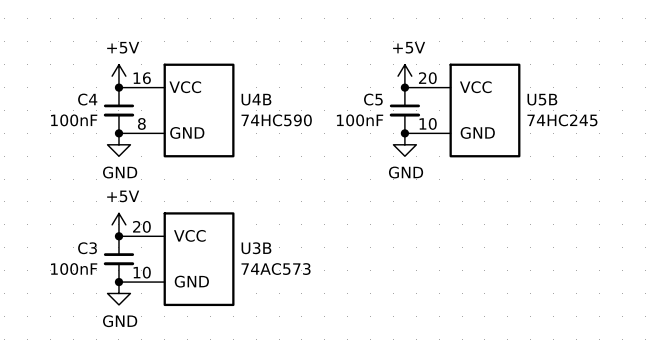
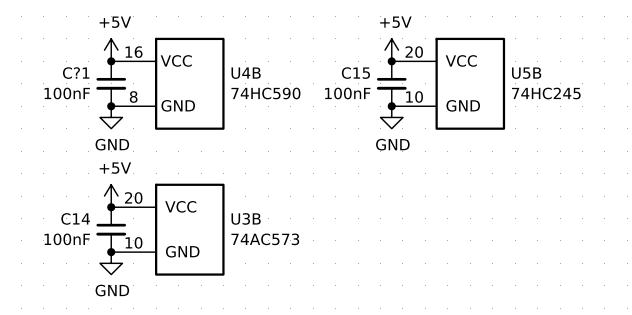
C4 name: C4 (87, 99) -> C?1 (76, 73)
C5 name: C5 (373, 99) -> C15 (355, 73)
C3 name: C3 (87, 248) -> C14 (75, 218)

